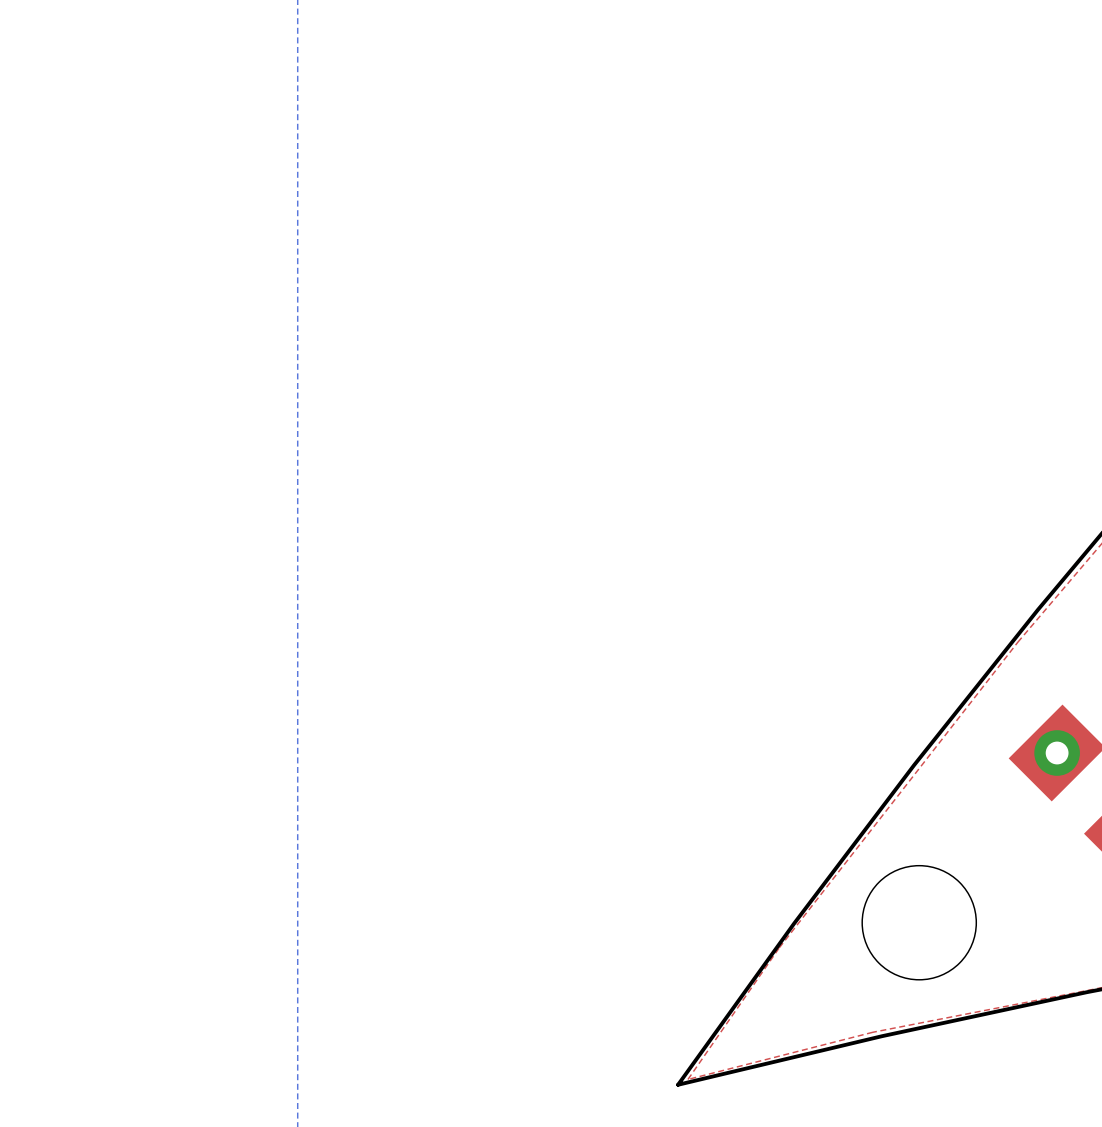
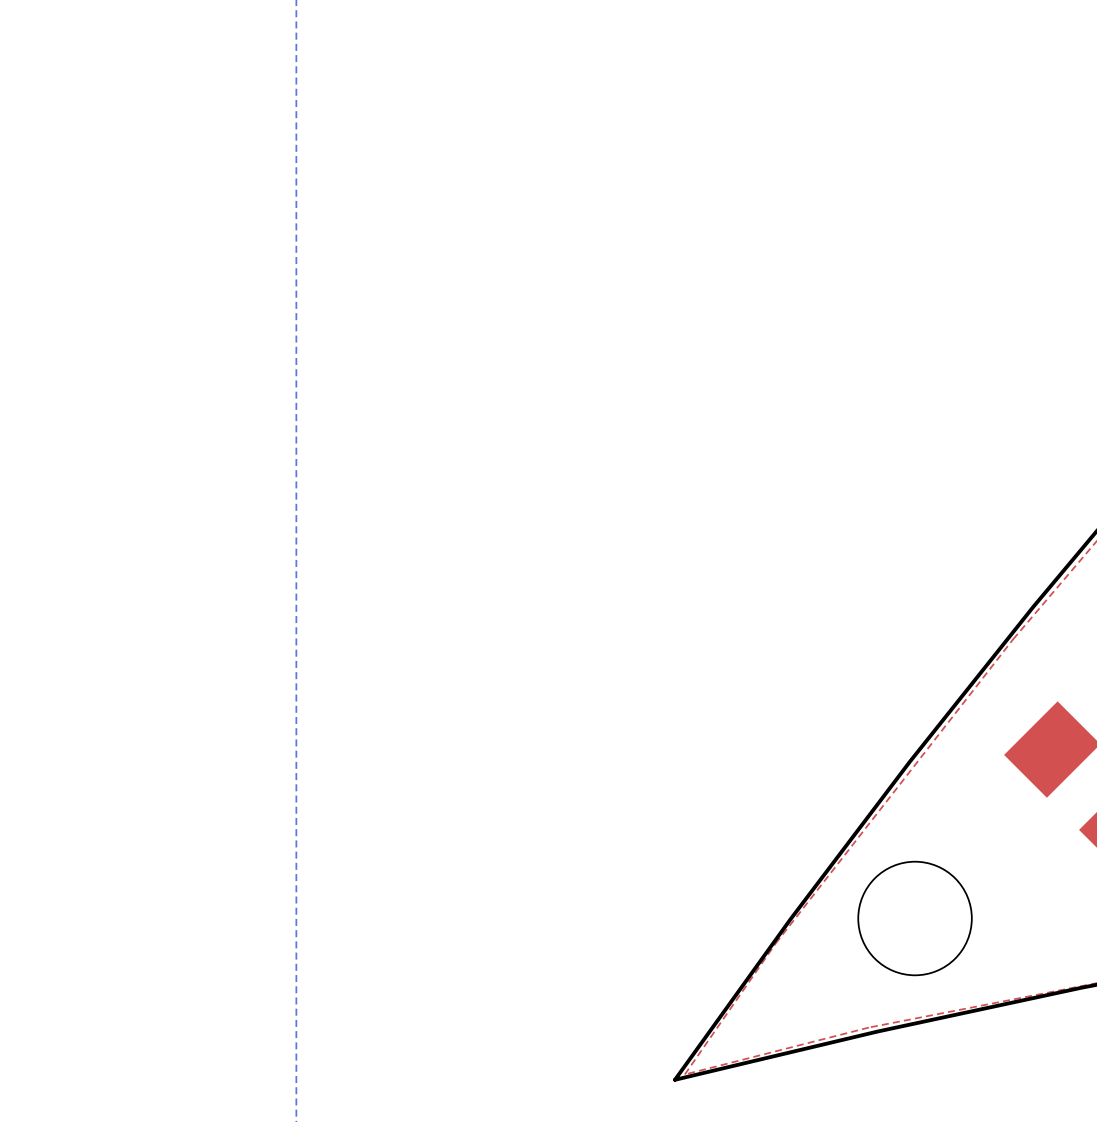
via: (1057, 753) -> none

